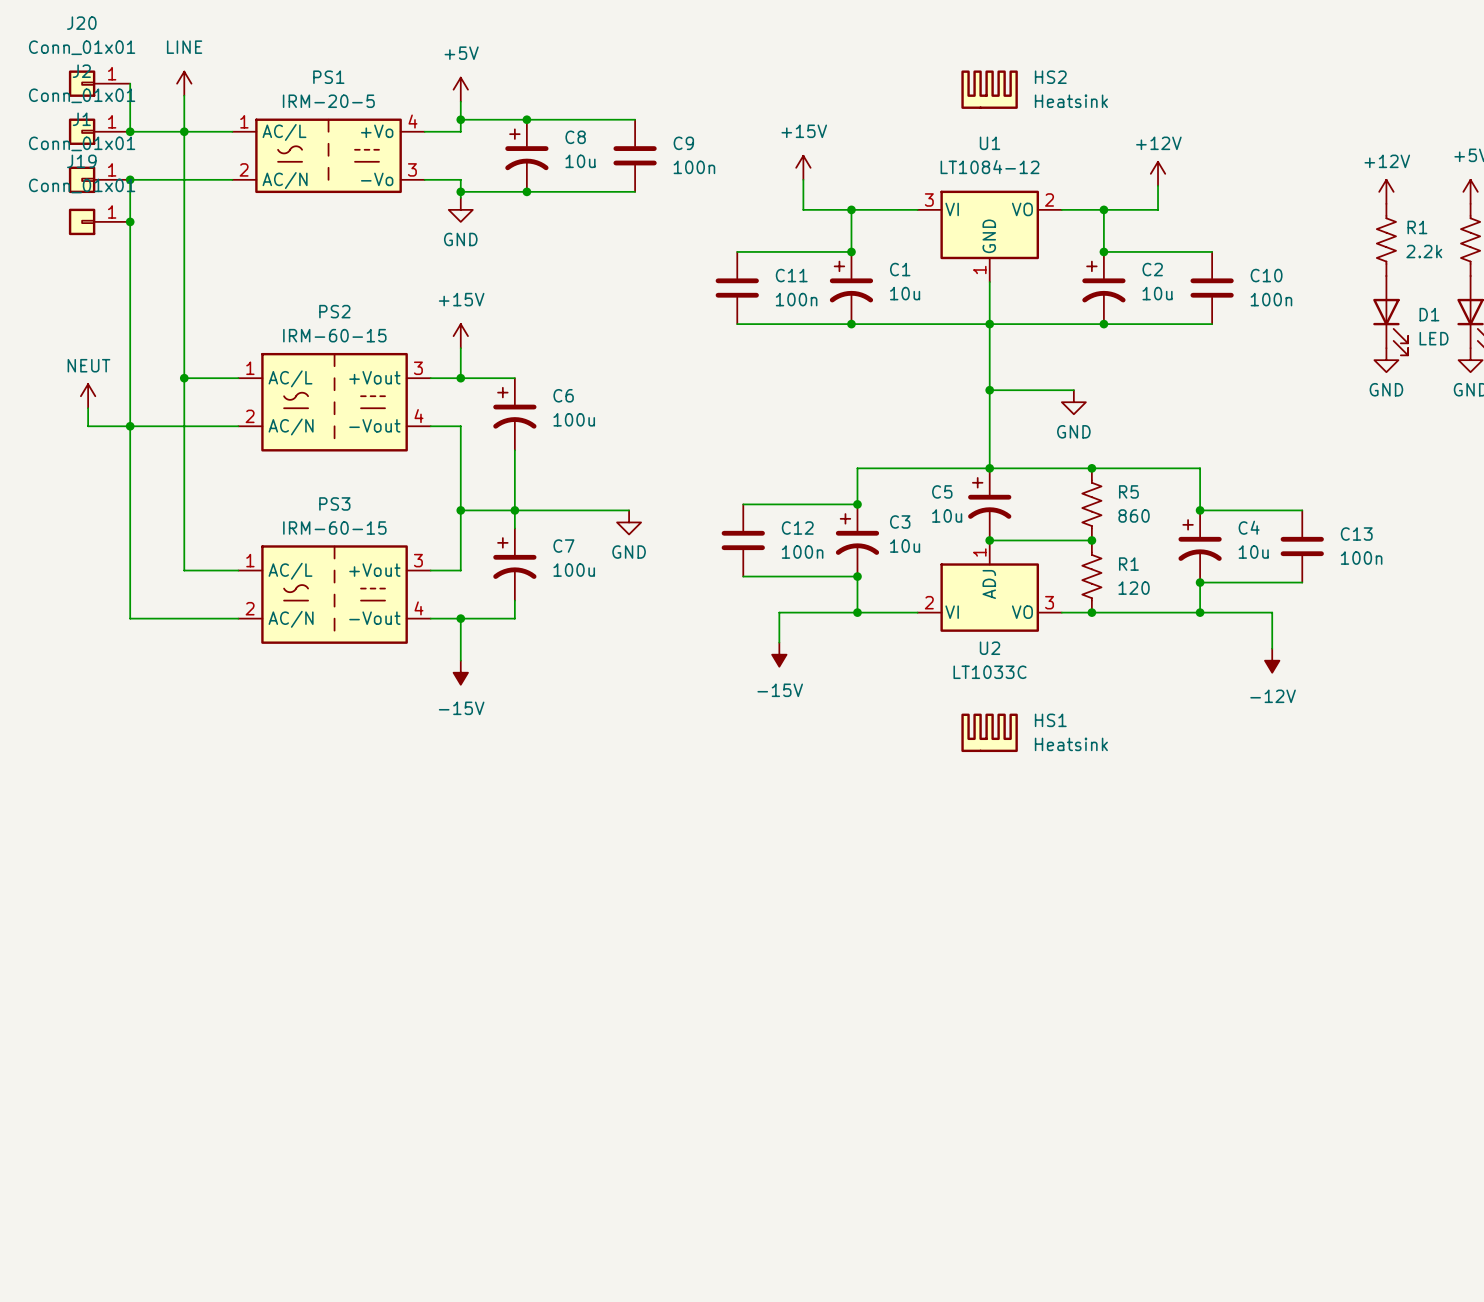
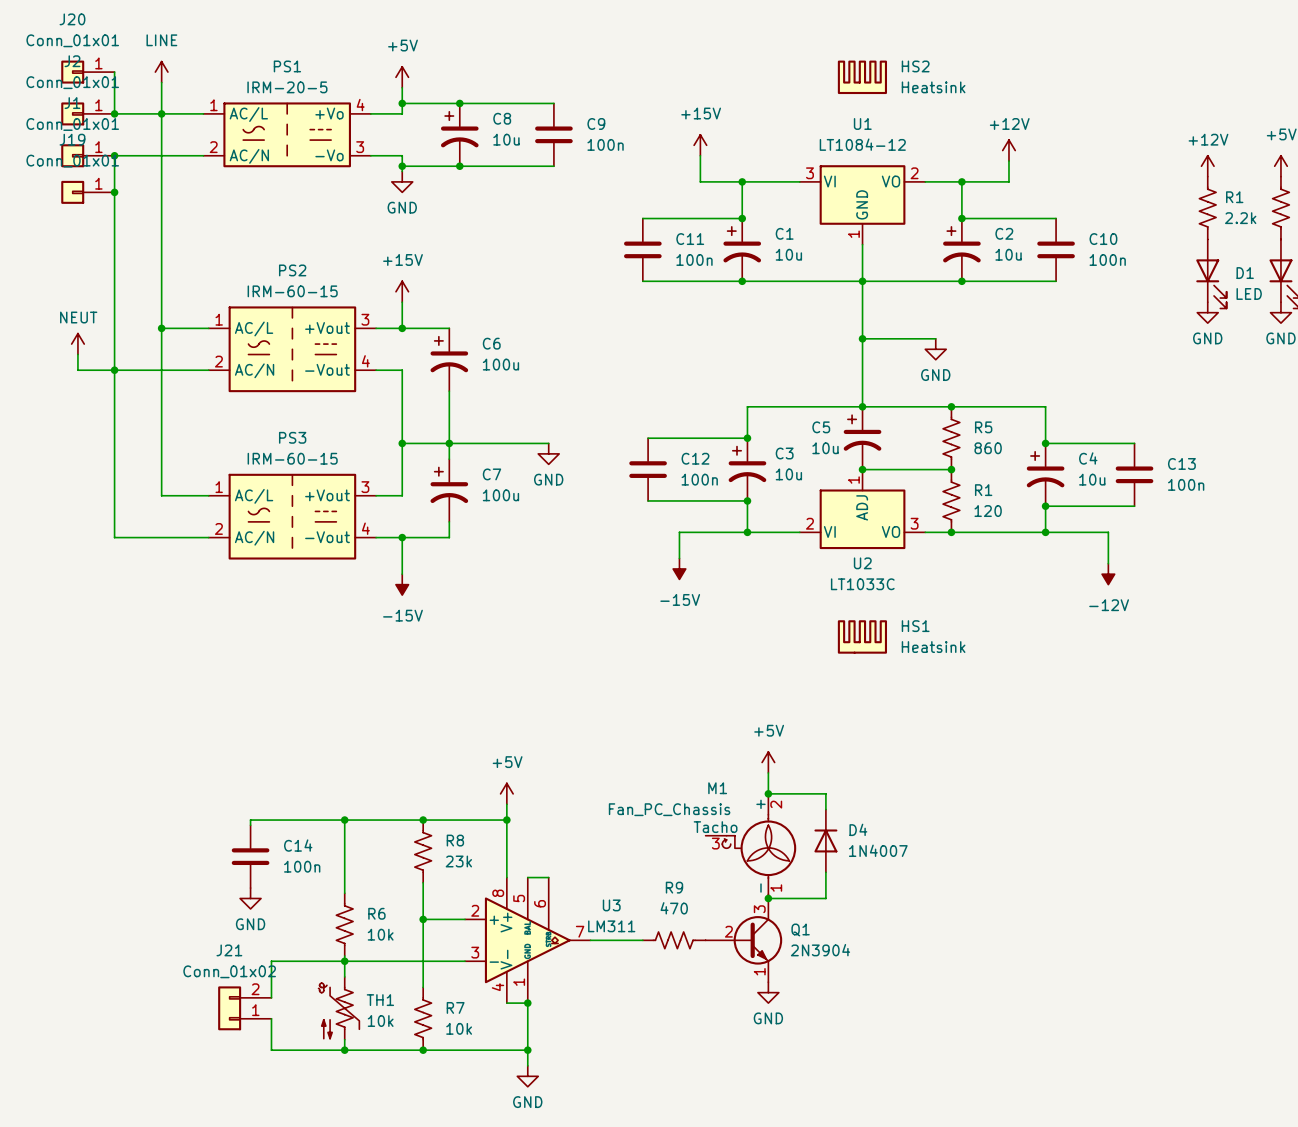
power symbol: none -> +5V (768, 762)
wire: none -> (768, 772) (768, 793) (825, 793) (825, 809)
power symbol: none -> +5V (506, 793)
junction: none -> (768, 793)
wire: none -> (506, 804) (506, 877)
wire: none -> (344, 820) (344, 893)
junction: none -> (344, 820)
junction: none -> (423, 820)
wire: none -> (506, 820) (250, 820) (250, 825)
junction: none -> (506, 820)
D4: none -> 1N4007 (825, 840)
M1: none -> Fan_PC_Chassis (750, 846)
R8: none -> 23k (423, 851)
C14: none -> 100n (250, 856)
wire: none -> (825, 872) (825, 898) (768, 898)
wire: none -> (527, 877) (548, 877)
wire: none -> (423, 882) (423, 987)
power symbol: none -> GND (250, 898)
junction: none -> (768, 898)
wire: none -> (423, 919) (465, 919)
junction: none -> (423, 919)
R6: none -> 10k (344, 924)
U3: none -> LM311 (527, 940)
wire: none -> (590, 940) (642, 940)
R9: none -> 470 (674, 940)
Q1: none -> 2N3904 (743, 940)
wire: none -> (344, 956) (344, 976)
junction: none -> (344, 961)
wire: none -> (465, 961) (271, 961) (271, 997)
power symbol: none -> GND (768, 992)
wire: none -> (506, 1003) (527, 1003) (527, 1065)
junction: none -> (527, 1003)
J21: none -> Conn_01x02 (244, 1008)
TH1: none -> 10k (338, 1008)
wire: none -> (271, 1018) (271, 1050) (527, 1050)
R7: none -> 10k (423, 1018)
wire: none -> (344, 1039) (344, 1050)
junction: none -> (344, 1050)
junction: none -> (423, 1050)
junction: none -> (527, 1050)
power symbol: none -> GND (527, 1076)

